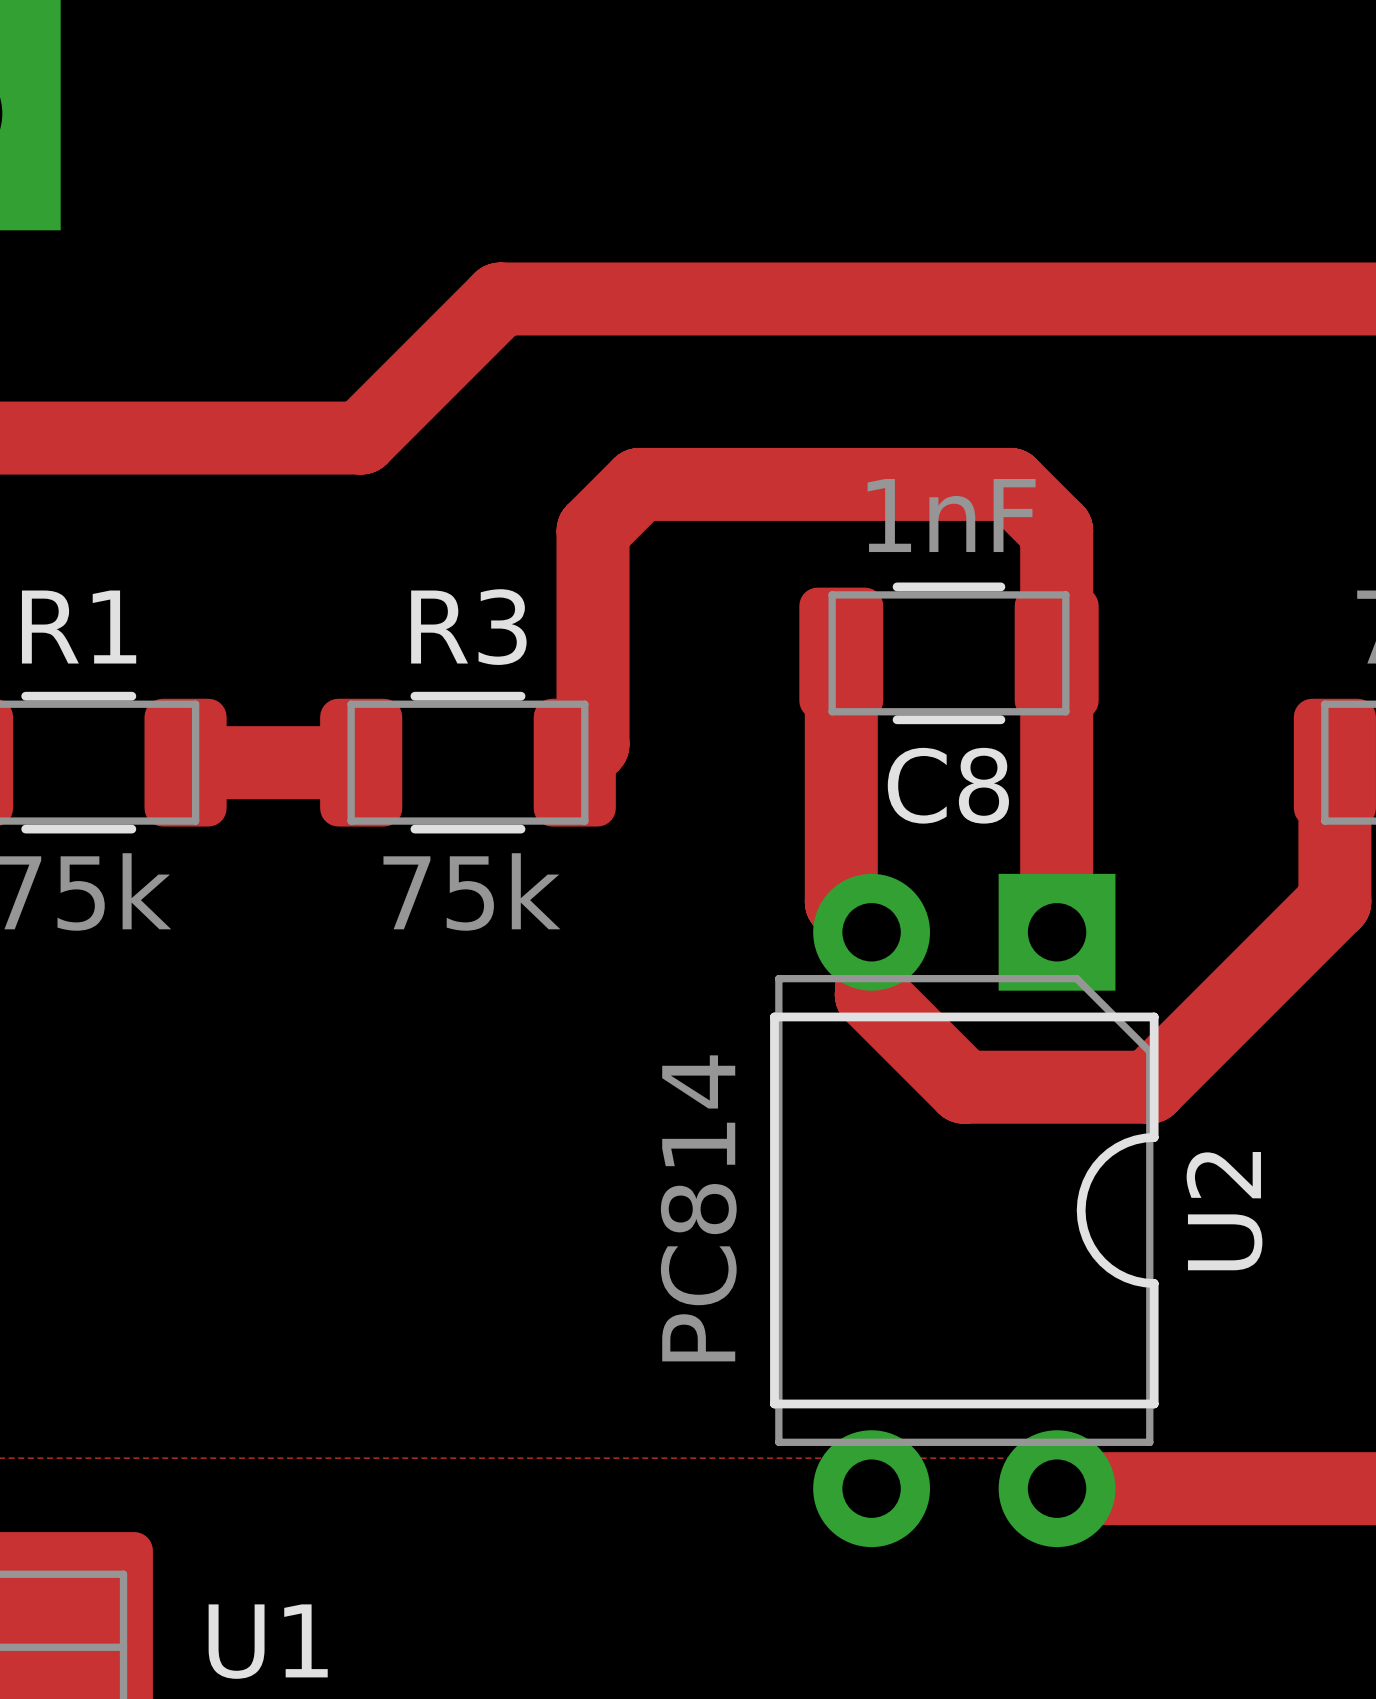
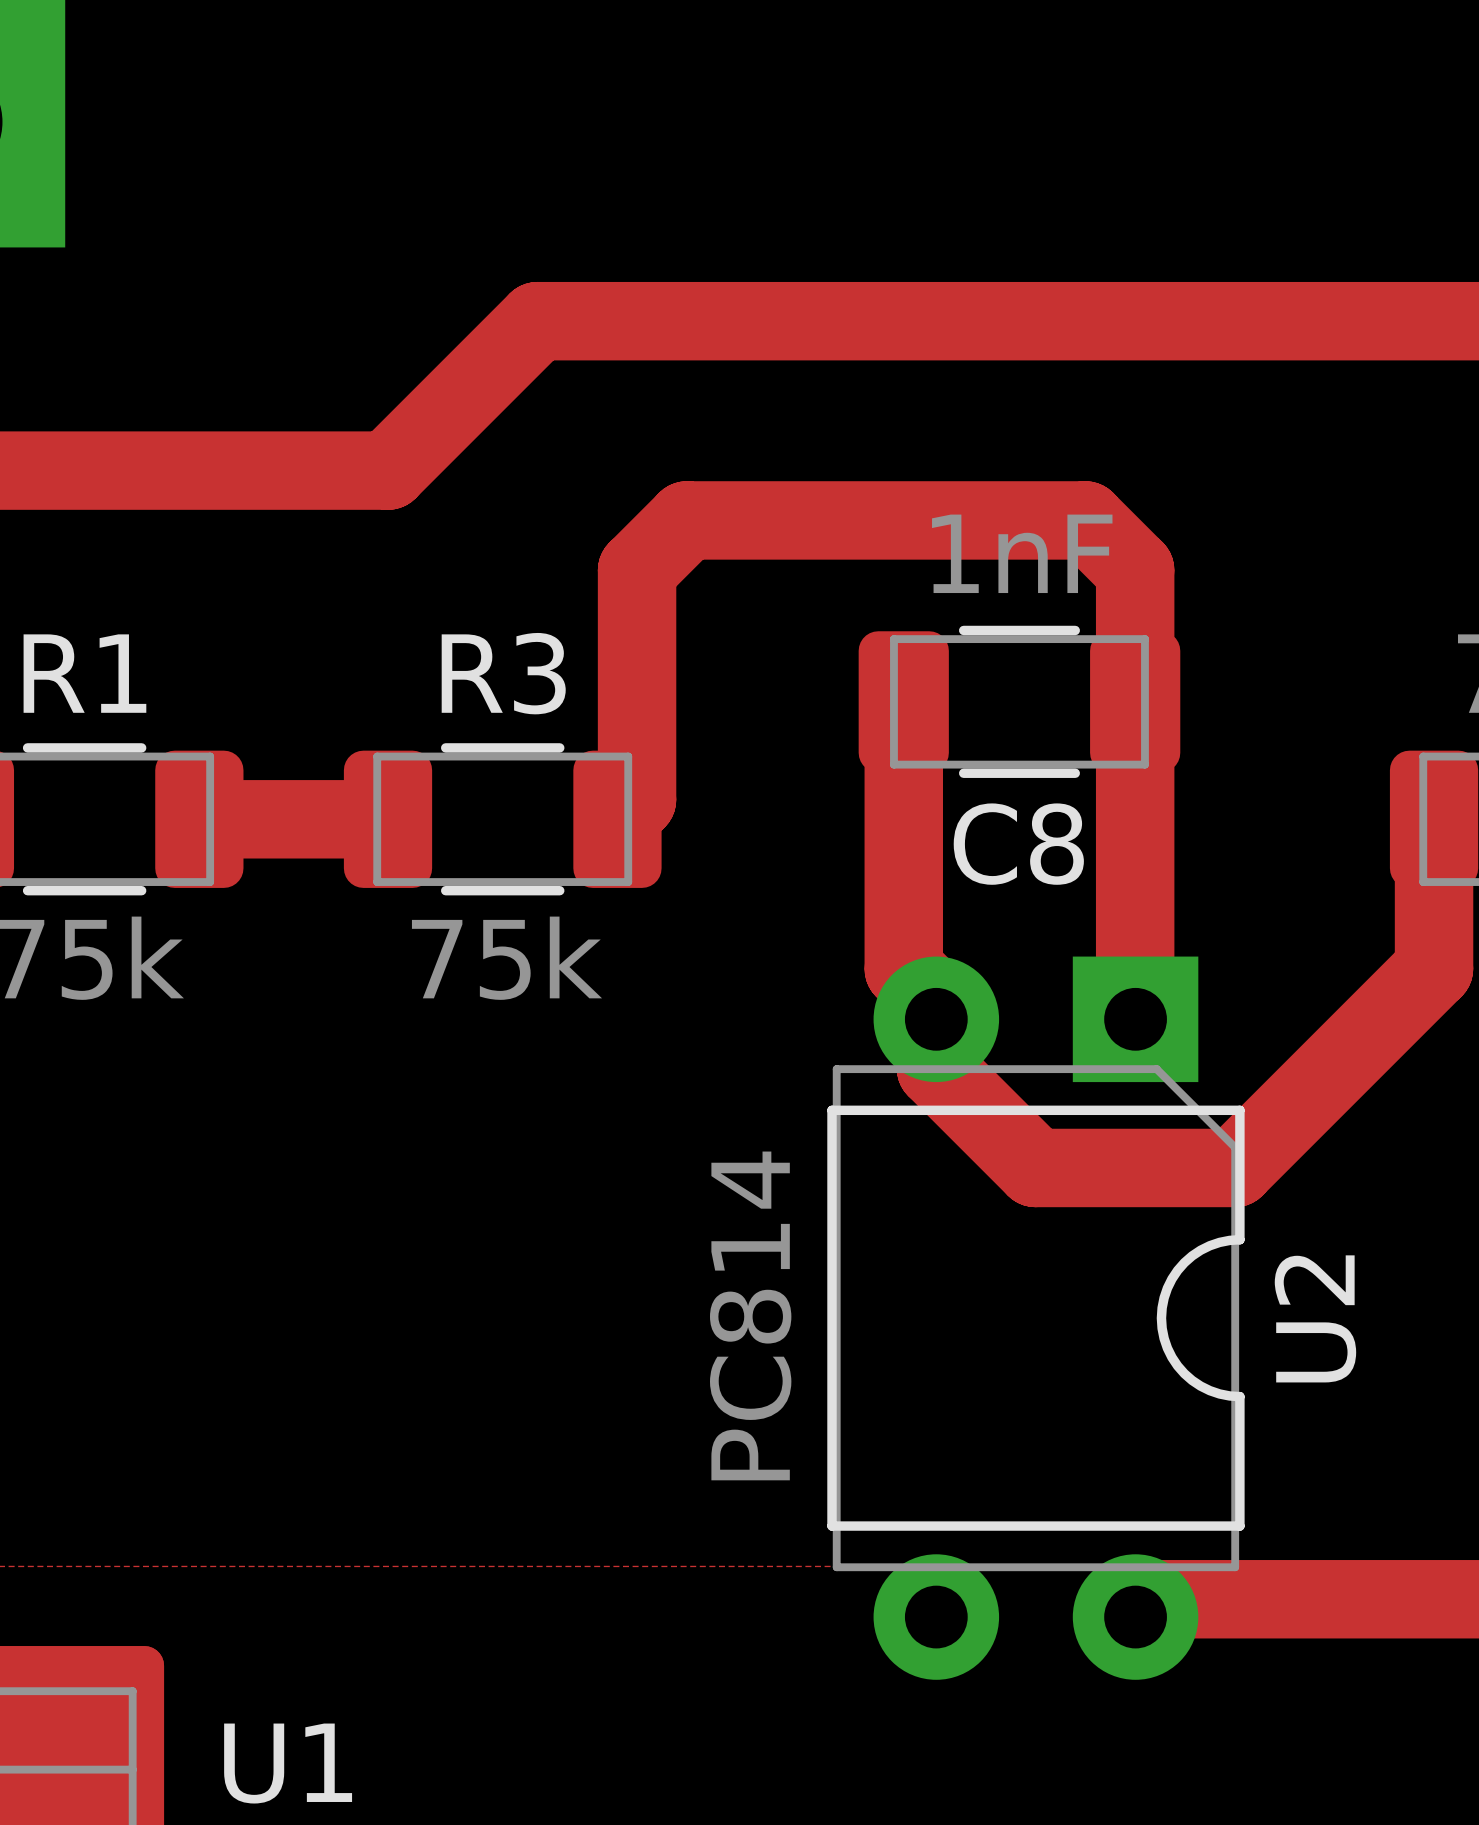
U2 position: (964, 1210) -> (1035, 1318)

